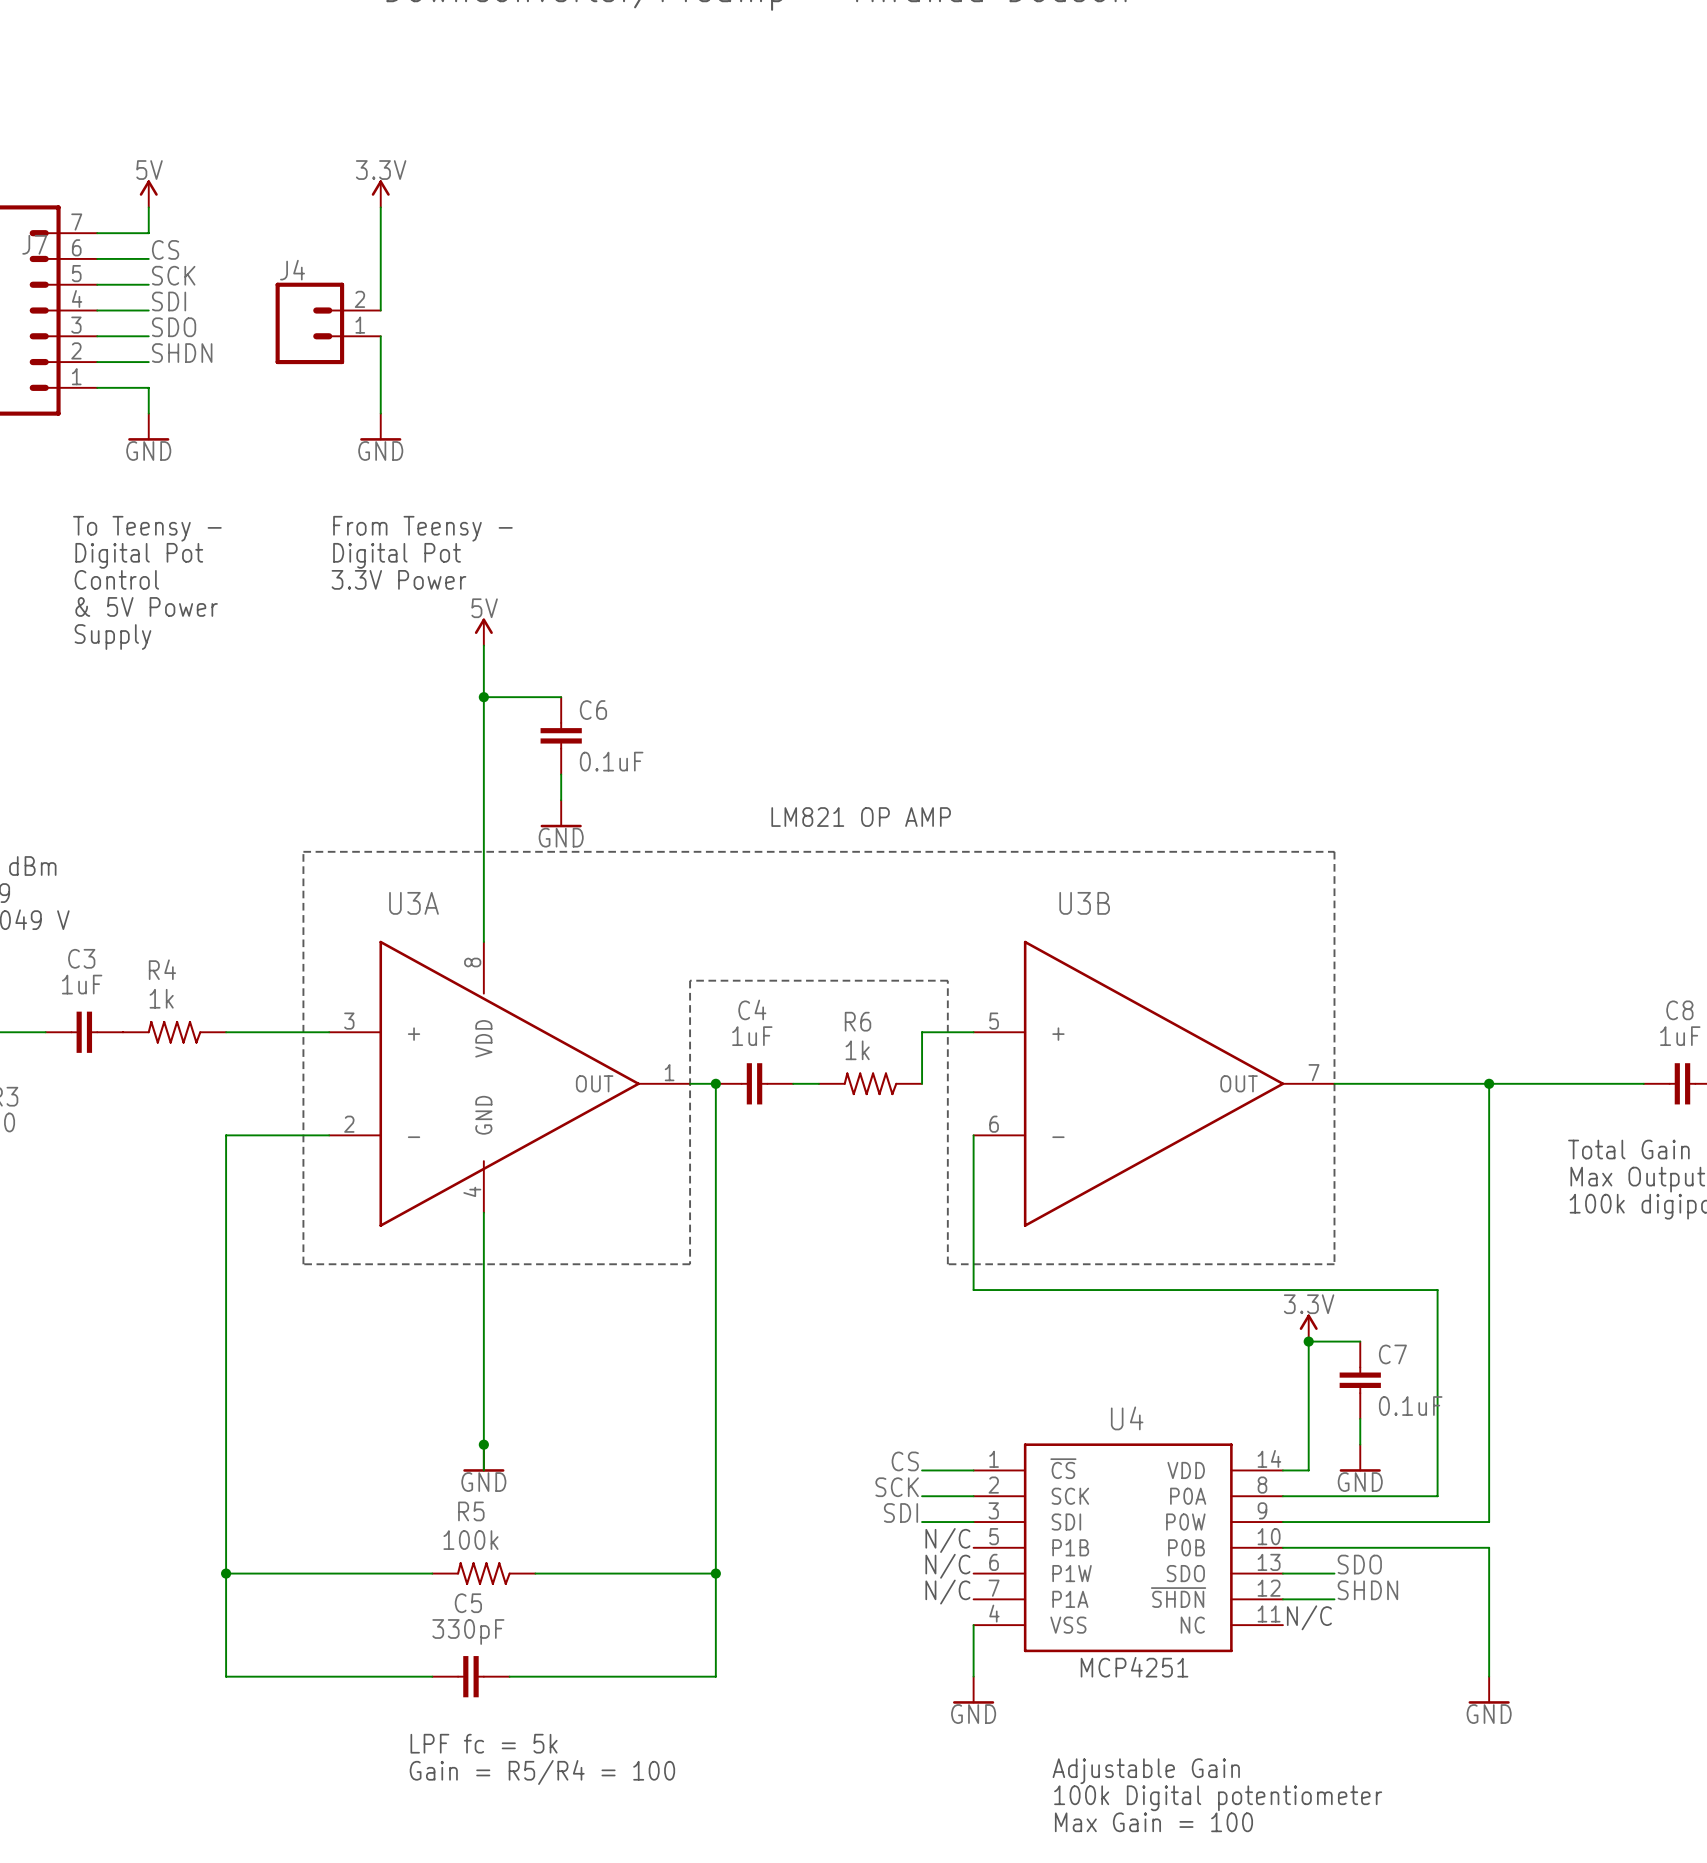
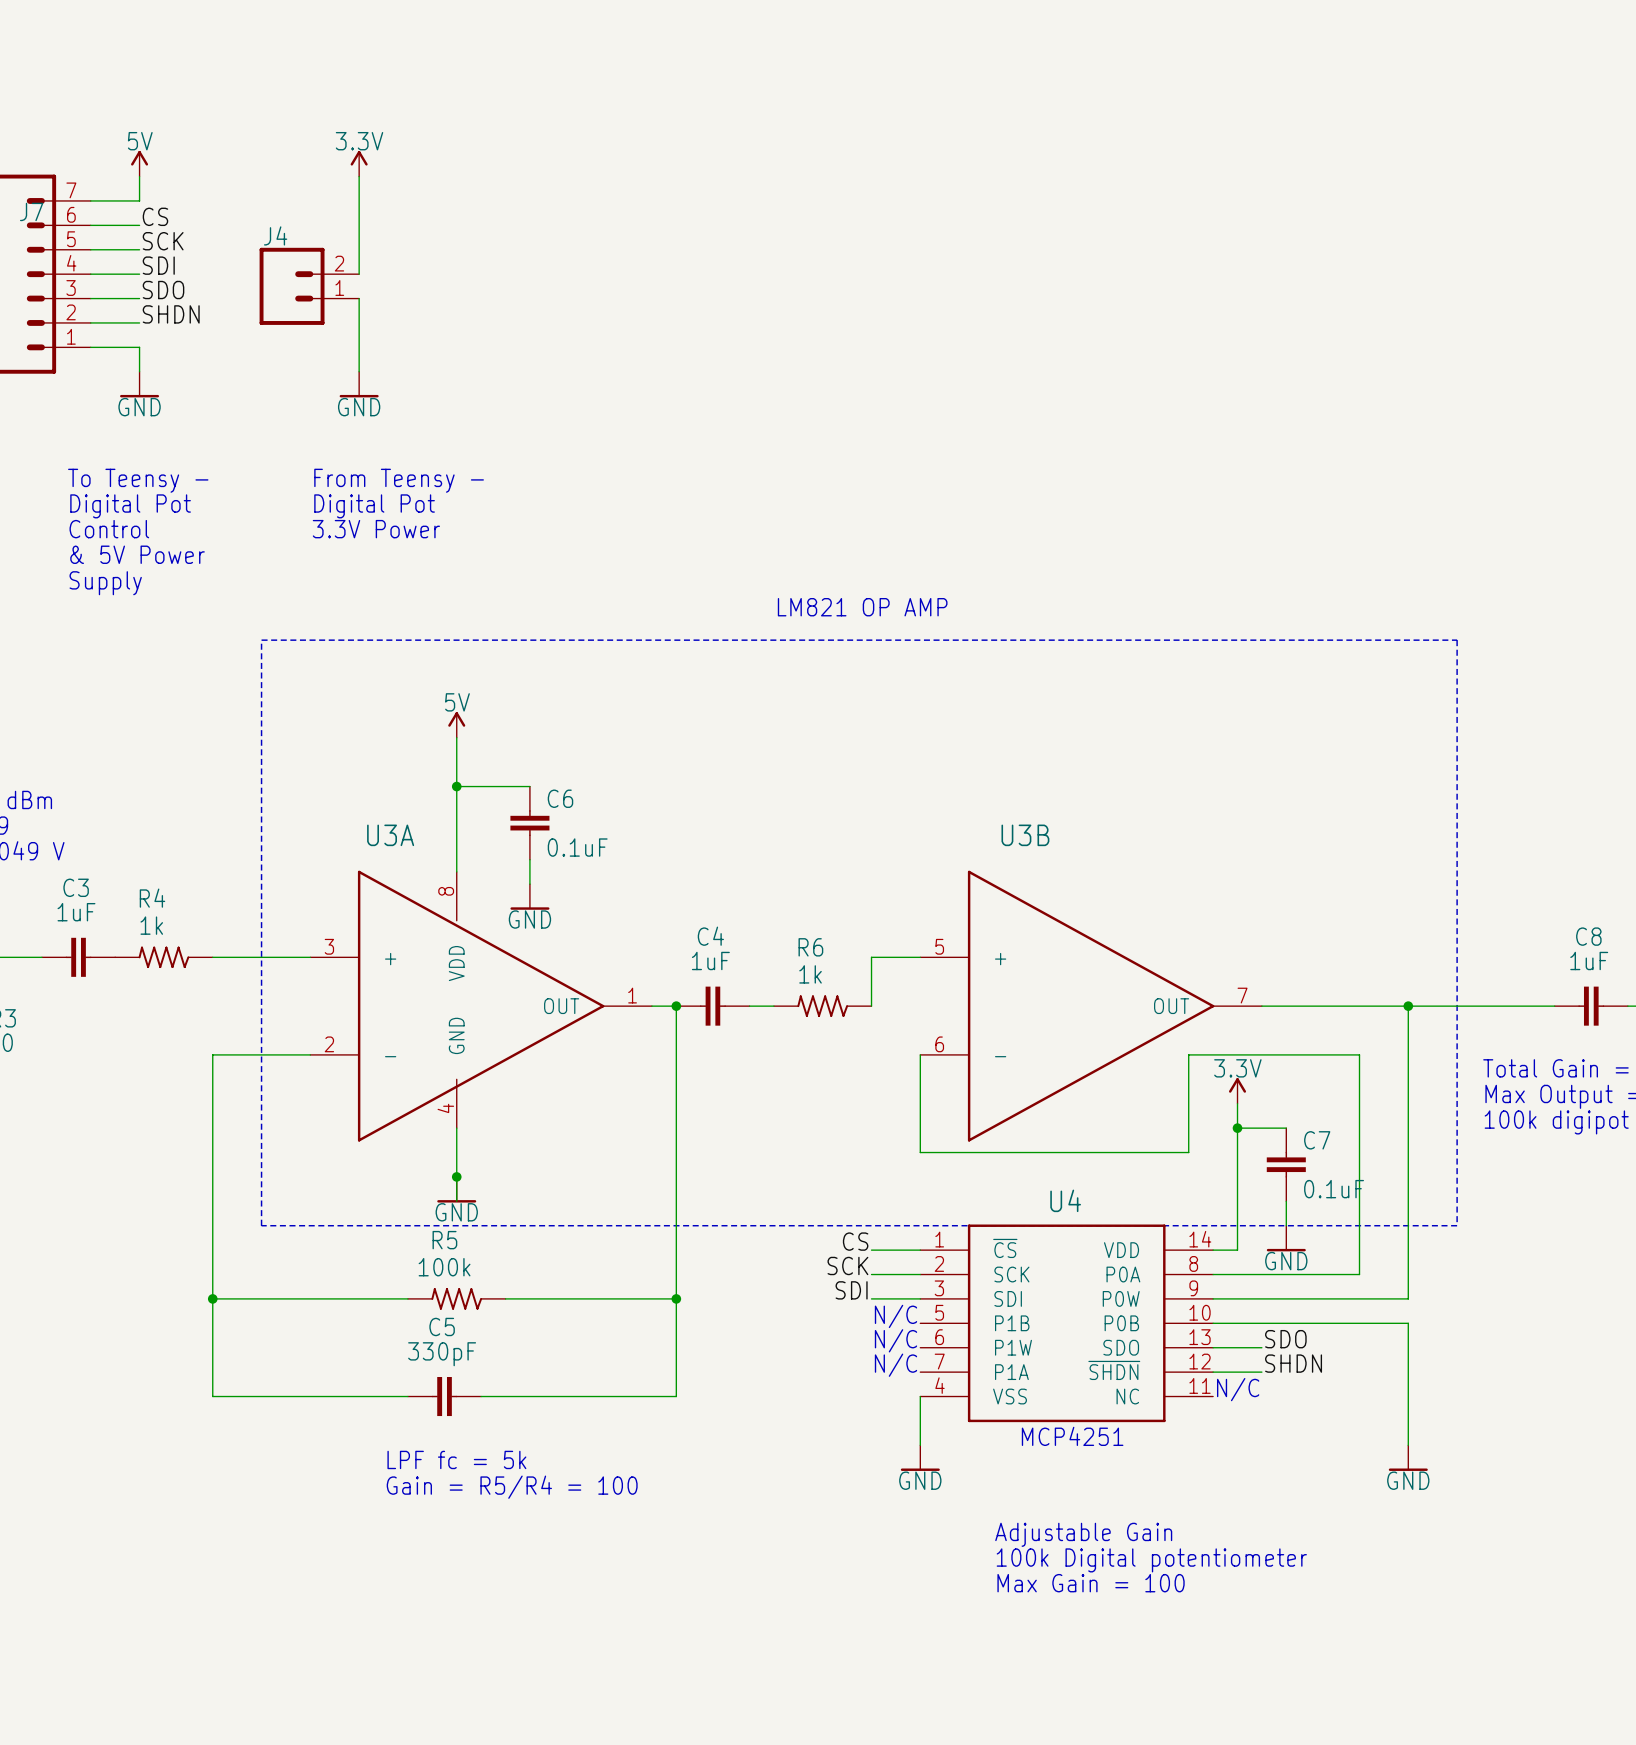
power symbol position: 5V (483, 632) -> 5V (456, 724)
wire: (483, 645) (483, 800) -> none
junction: (483, 697) -> none
C6 position: (561, 735) -> (529, 823)
wire: (561, 774) (561, 800) -> (529, 859) (529, 884)
power symbol position: GND (561, 813) -> GND (529, 896)
text position: LM821 OP AMP (861, 817) -> LM821 OP AMP (862, 607)
line: (303, 851) (1334, 851) (1334, 1264) (947, 1264) (947, 980) (690, 980) (690, 1264) (303, 1264) (303, 851) -> (261, 640) (261, 1225) (1457, 1225) (1457, 640) (261, 640)
junction: none -> (456, 786)
wire: none -> (1237, 1103) (1237, 1250) (1213, 1250)
wire: none -> (1237, 1128) (1286, 1128)
junction: none -> (1237, 1128)
wire: (973, 1238) (973, 1290) (1437, 1290) -> (920, 1152) (1188, 1152) (1188, 1054) (1359, 1054) (1359, 1201)
junction: none -> (456, 1176)
wire: (483, 1290) (483, 1470) -> none
power symbol position: 3.3V (1308, 1328) -> 3.3V (1237, 1090)
power symbol: none -> GND (1286, 1238)
junction: (1308, 1341) -> none
wire: (1360, 1341) (1308, 1341) (1308, 1470) -> (1261, 1372) (1237, 1372)
wire: none -> (871, 1274) (920, 1274)
wire: (1437, 1367) (1437, 1496) (1282, 1496) -> (1359, 1274) (1213, 1274)
C7 position: (1360, 1380) -> (1286, 1164)
junction: none -> (212, 1298)
junction: none -> (676, 1298)
wire: (1489, 1393) (1489, 1418) -> (1408, 1298) (1213, 1298)
text: none -> N/C (896, 1316)
wire: none -> (1213, 1323) (1408, 1323)
wire: (1360, 1418) (1360, 1444) -> (1286, 1201) (1286, 1225)
text: none -> N/C (896, 1340)
junction: (483, 1444) -> none
power symbol position: GND (483, 1458) -> GND (456, 1189)
power symbol: GND (1360, 1458) -> none
label position: CS (905, 1461) -> CS (855, 1241)
text: none -> N/C (896, 1365)
wire: (922, 1470) (973, 1470) -> (871, 1250) (920, 1250)
label position: SCK (897, 1487) -> SCK (847, 1265)
wire: (226, 1496) (226, 1676) (432, 1676) -> (212, 1396) (407, 1396)
wire: (715, 1496) (715, 1676) (509, 1676) -> (676, 1396) (481, 1396)
wire: (922, 1496) (973, 1496) -> (920, 1445) (920, 1396)
label position: SDI (901, 1512) -> SDI (851, 1290)
wire: (922, 1522) (973, 1522) -> (871, 1298) (920, 1298)
wire: (1282, 1522) (1489, 1522) -> (1408, 1445) (1408, 1420)
text: N/C (947, 1540) -> none
U4 position: (1128, 1547) -> (1066, 1323)
wire: (1282, 1547) (1489, 1547) (1489, 1676) -> none
power symbol: none -> GND (1408, 1458)
label position: SDO (1359, 1564) -> SDO (1285, 1339)
text: N/C (947, 1566) -> none
wire: (226, 1573) (432, 1573) -> (212, 1298) (407, 1298)
junction: (226, 1573) -> none
R5 position: (483, 1573) -> (456, 1298)
wire: (535, 1573) (715, 1573) -> (505, 1298) (676, 1298)
junction: (715, 1573) -> none
wire: (1282, 1573) (1334, 1573) -> (1213, 1347) (1261, 1347)
label position: SHDN (1367, 1590) -> SHDN (1293, 1363)
text: N/C (947, 1592) -> none
wire: (1282, 1599) (1334, 1599) -> none
text position: N/C (1309, 1617) -> N/C (1238, 1389)
wire: (973, 1625) (973, 1676) -> none
text position: MCP4251 (1134, 1667) -> MCP4251 (1072, 1436)
C5 position: (470, 1676) -> (444, 1396)
power symbol position: GND (973, 1690) -> GND (920, 1458)
power symbol: GND (1489, 1690) -> none
text position: LPF fc = 5k (484, 1743) -> LPF fc = 5k (456, 1459)
text position: Adjustable Gain (1146, 1771) -> Adjustable Gain (1083, 1534)
text position: Gain = R5/R4 = 100 (542, 1772) -> Gain = R5/R4 = 100 (512, 1487)
text position: 100k Digital potentiometer (1218, 1798) -> 100k Digital potentiometer (1151, 1560)
text position: Max Gain = 100 (1153, 1822) -> Max Gain = 100 (1091, 1583)

